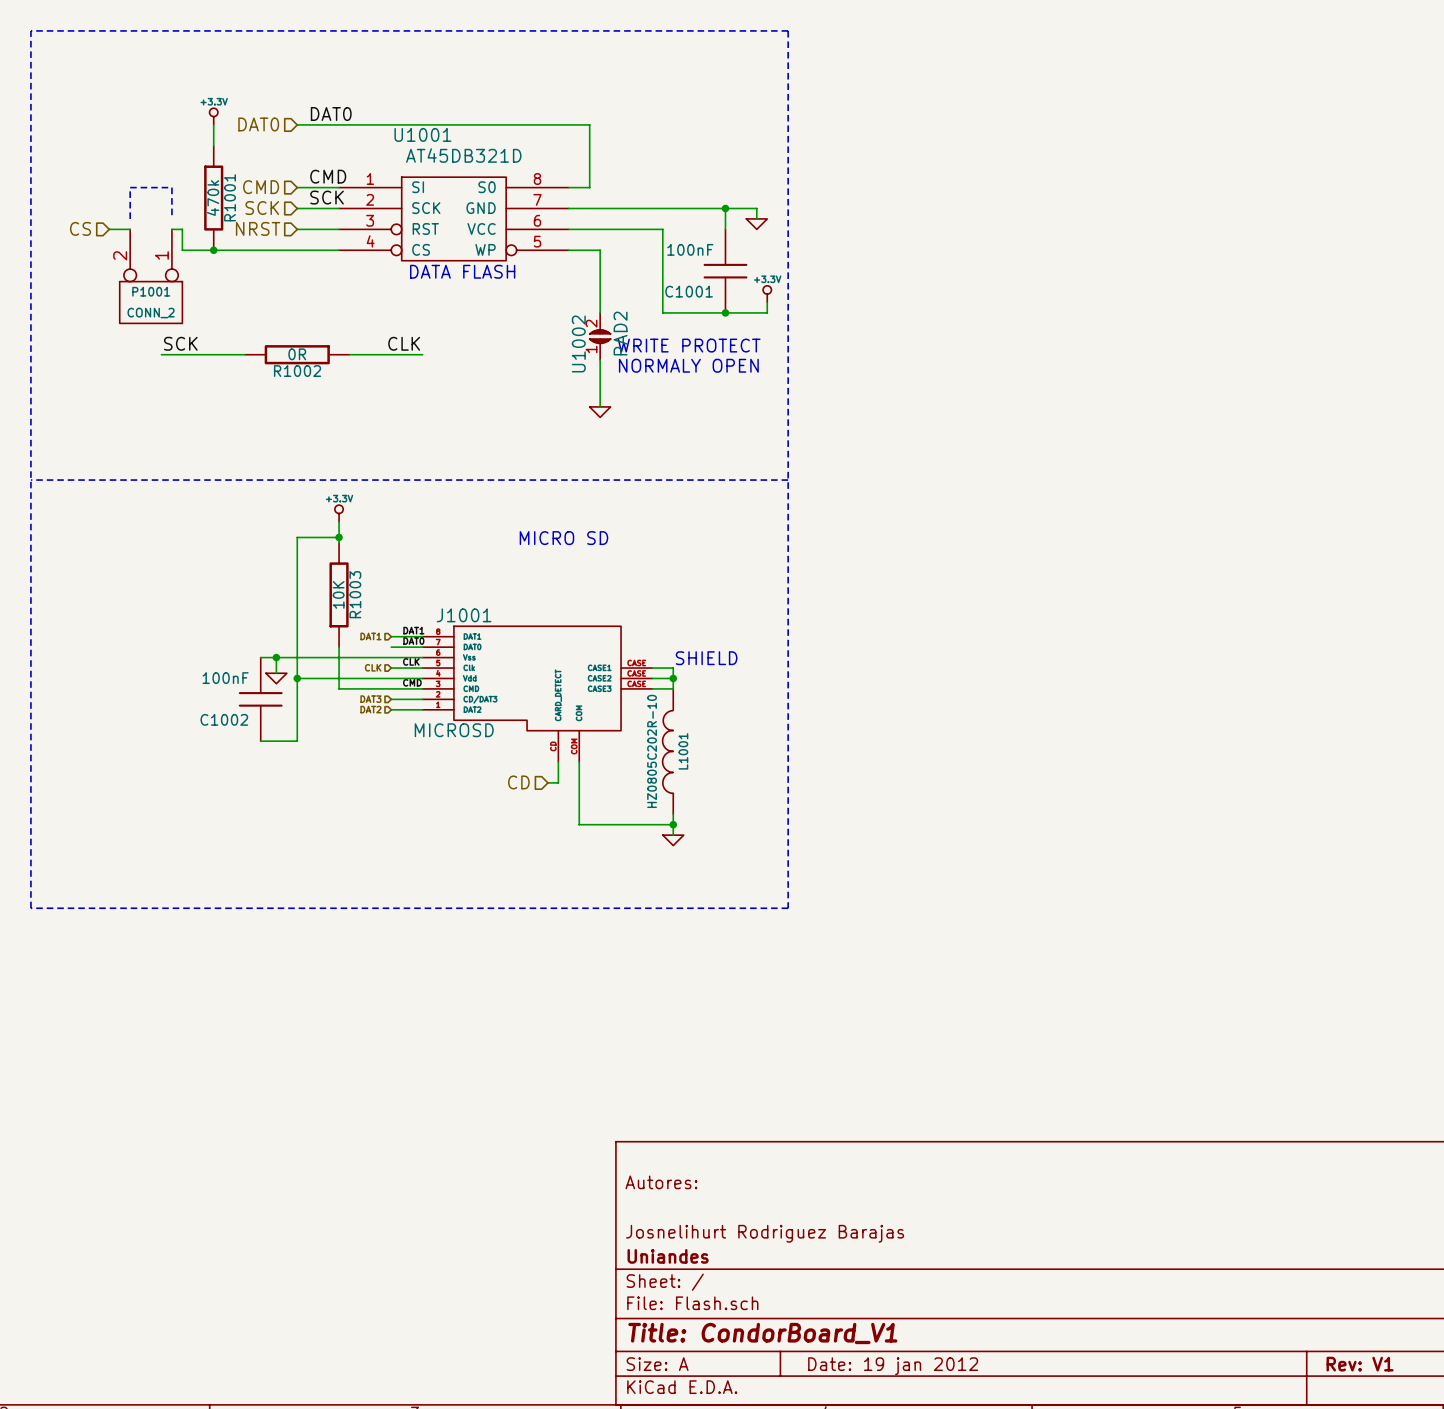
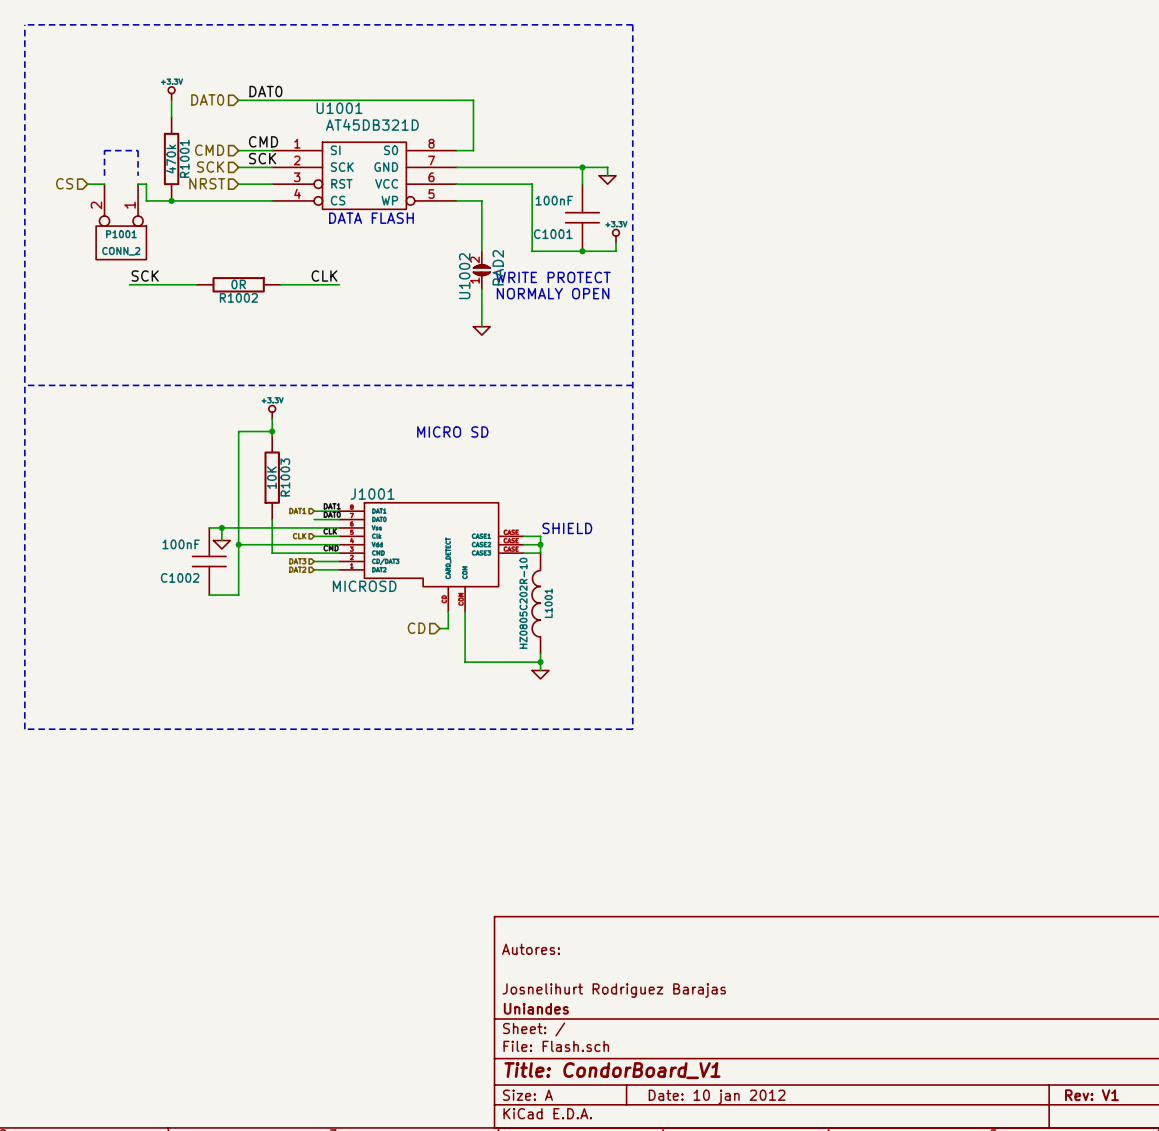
title block: Date: 19 jan 2012 (893, 1366) -> Date: 10 jan 2012 (717, 1096)

